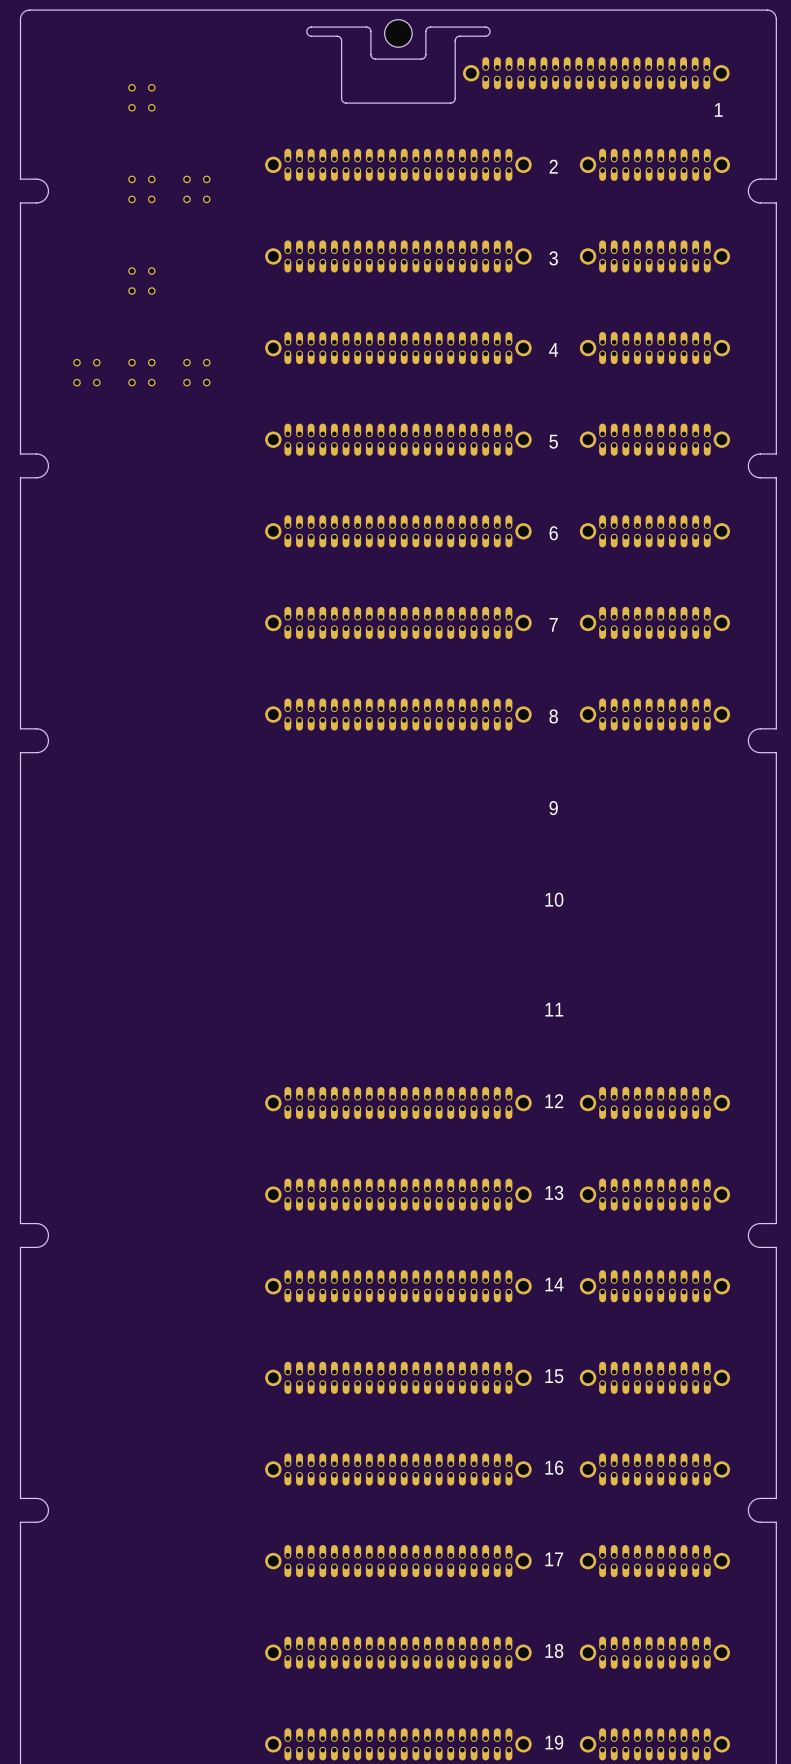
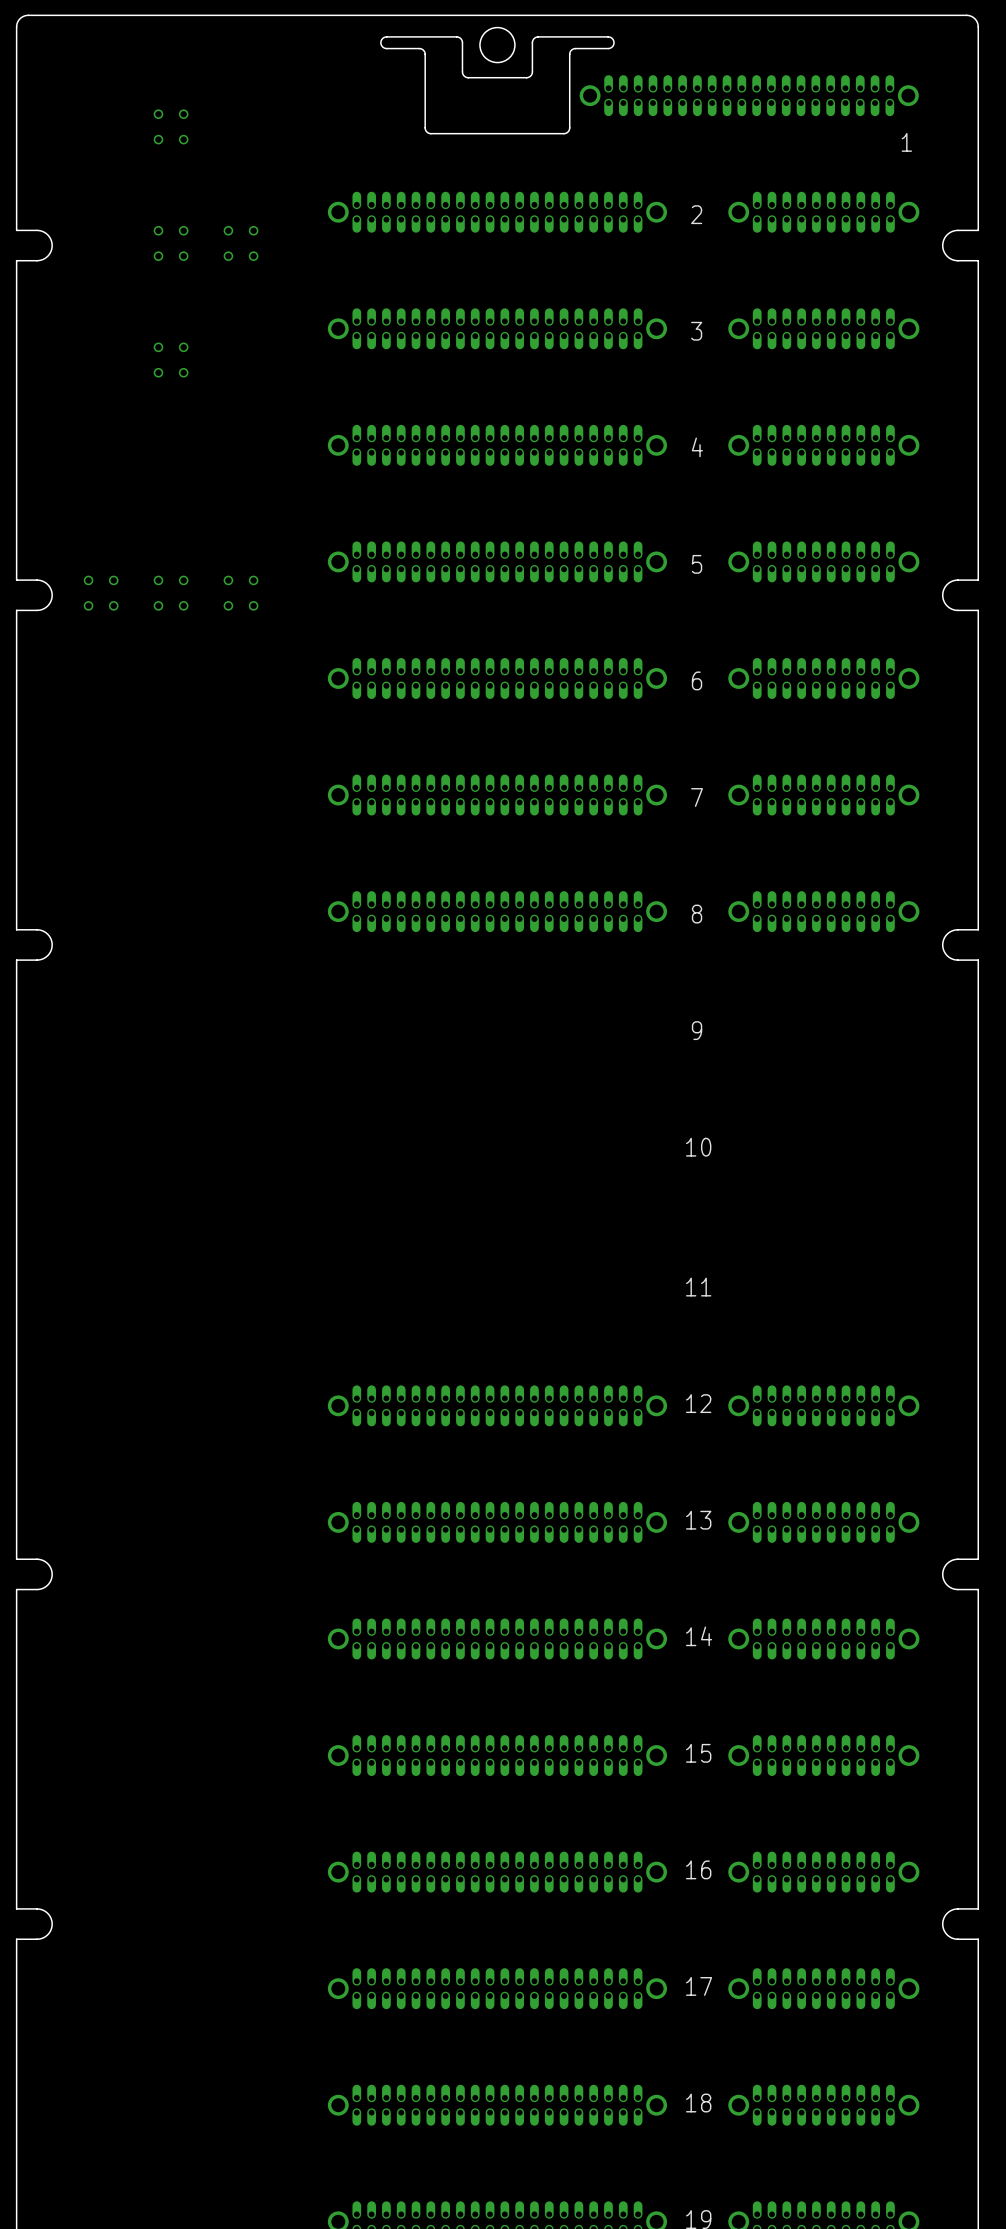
part: (86, 372) -> none
part: (141, 372) -> none
part: (196, 372) -> none
part: none -> (101, 593)
part: none -> (171, 593)
part: none -> (241, 593)

